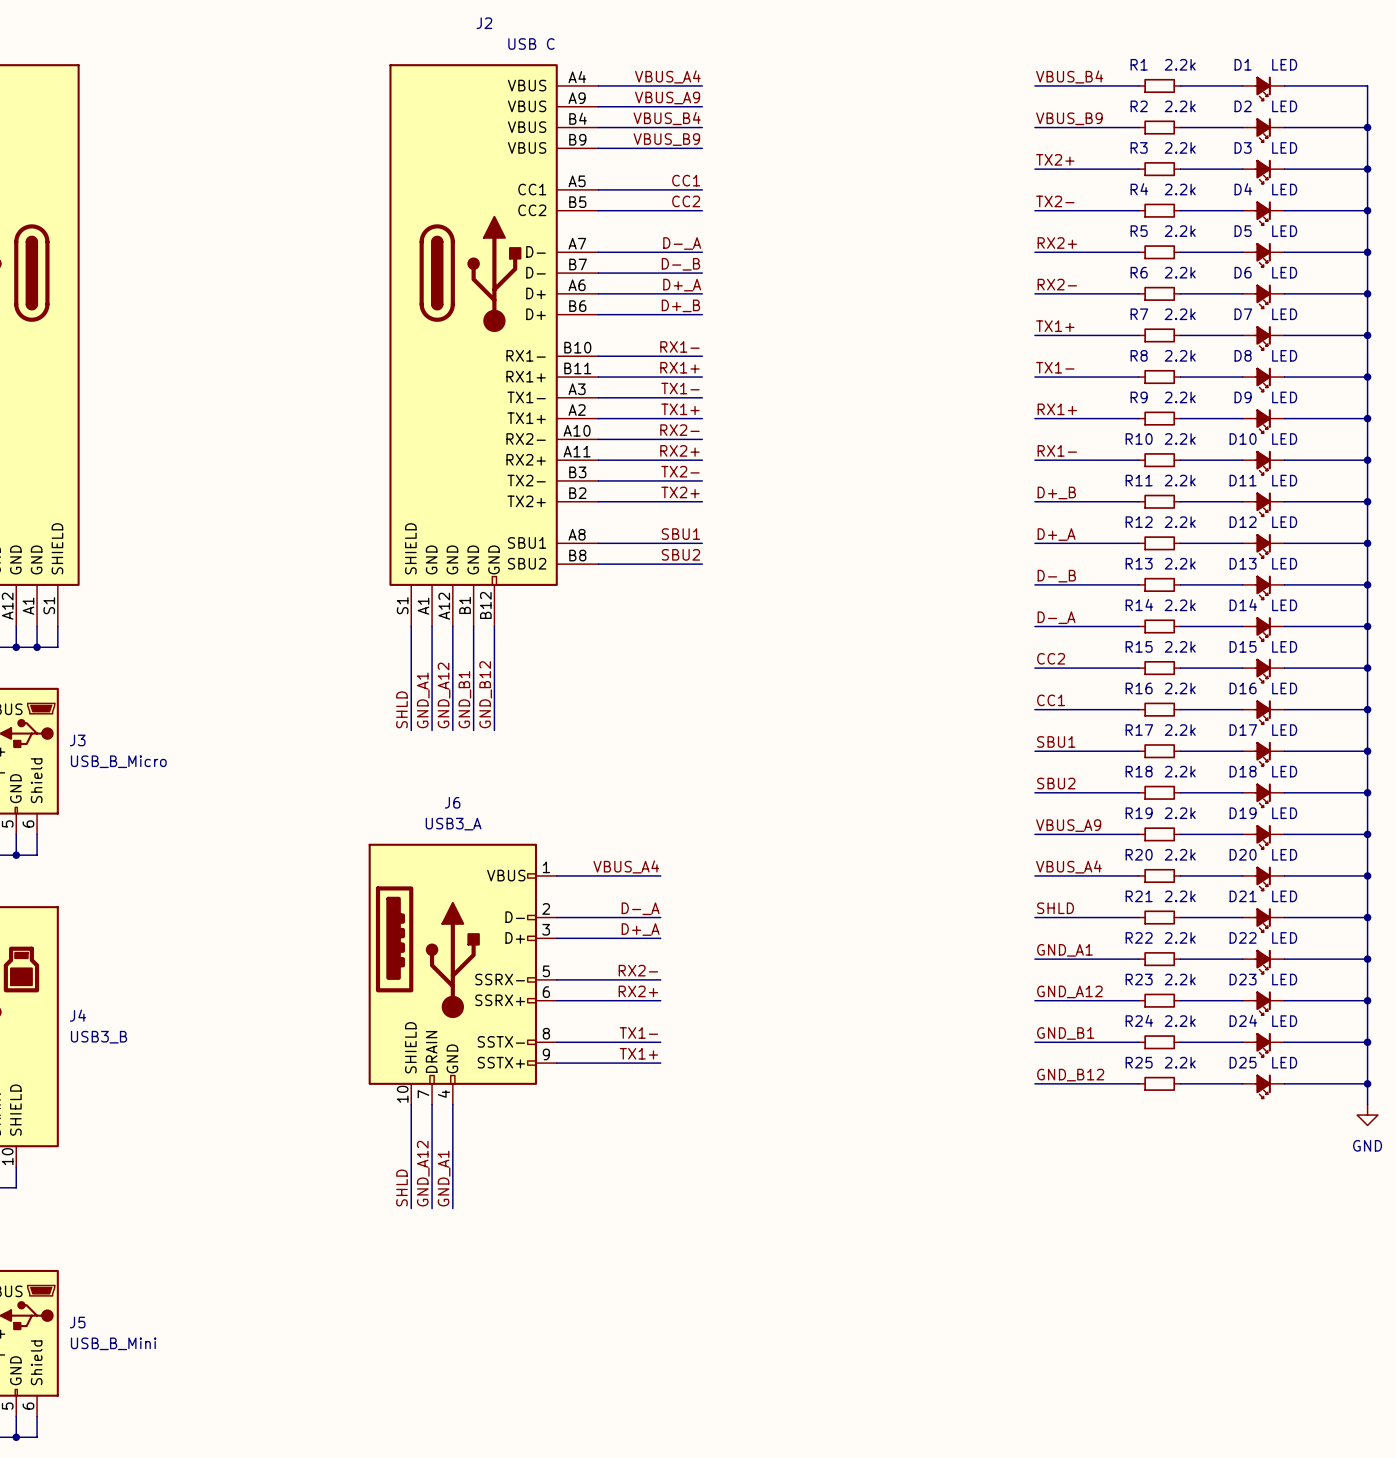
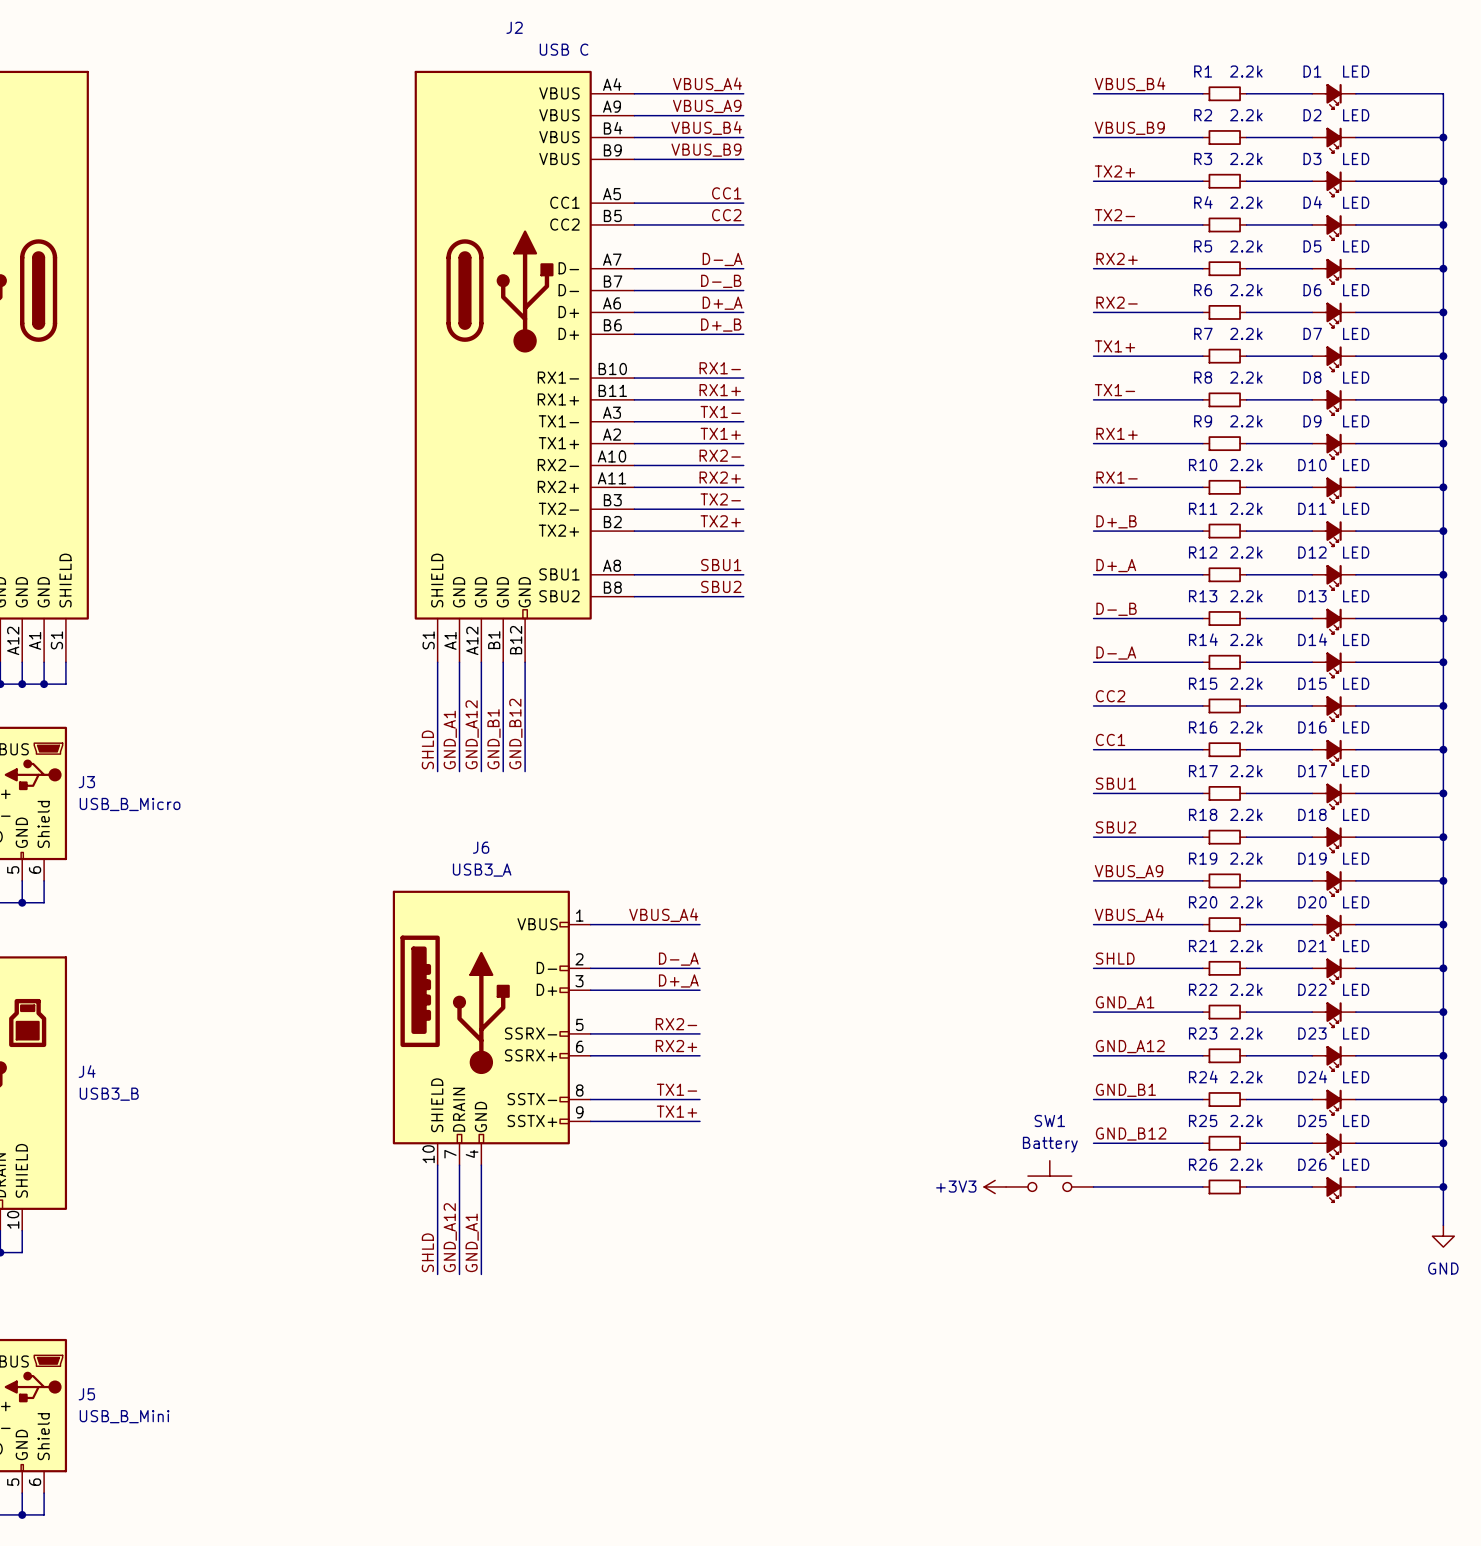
wire: none -> (1443, 1165) (1443, 1225)
SW1: none -> Battery (1049, 1176)
power symbol position: GND (1367, 1115) -> GND (1443, 1236)
power symbol: none -> +3V3 (995, 1186)
wire: none -> (1093, 1186) (1202, 1186)
R26: none -> 2.2k (1224, 1186)
wire: none -> (1246, 1186) (1312, 1186)
wire: none -> (1355, 1186) (1443, 1186)
junction: none -> (1443, 1186)
D26: none -> LED (1334, 1189)

